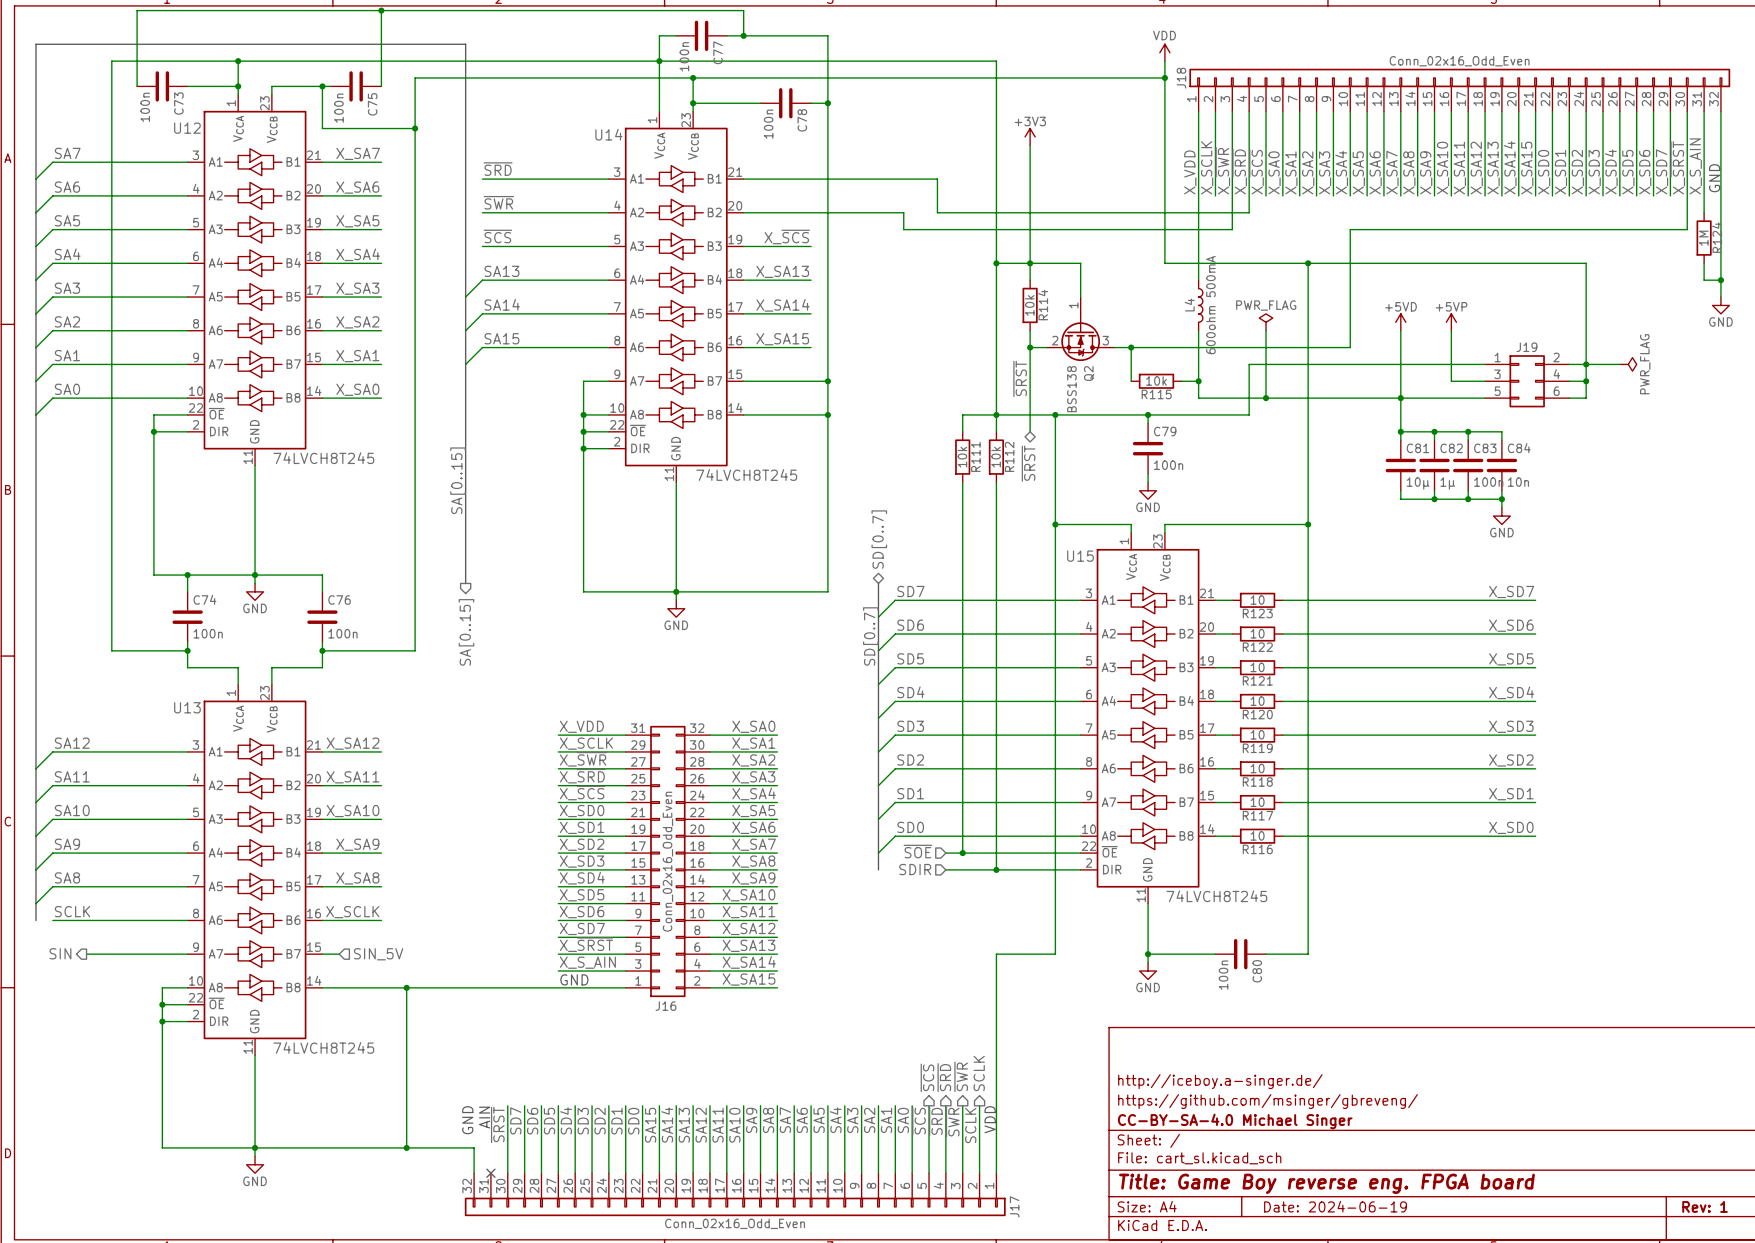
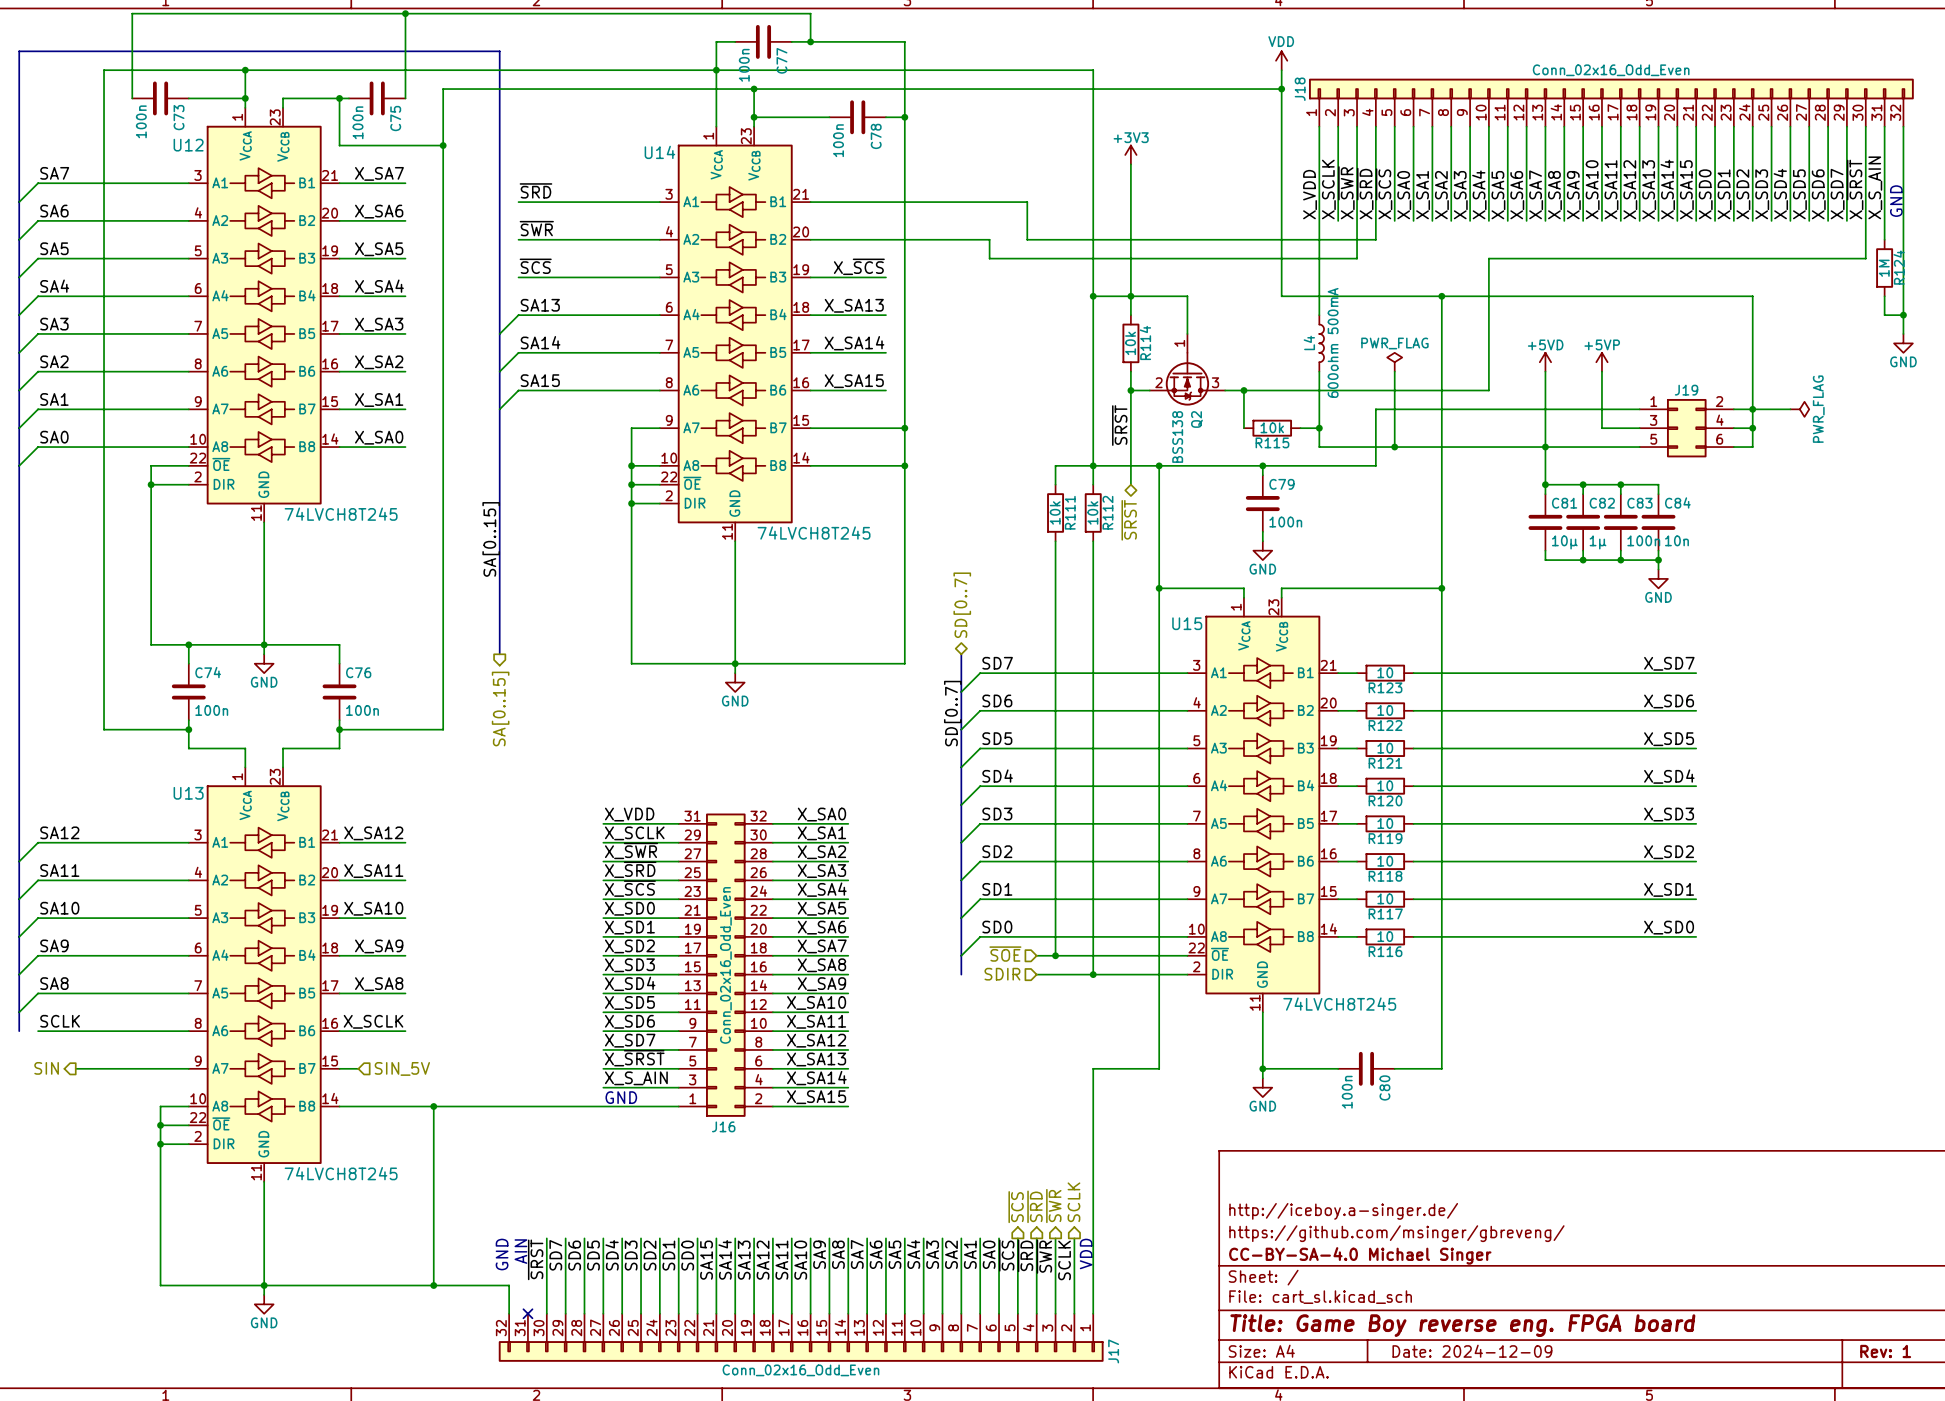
title block: Date: 2024-06-19 (1335, 1206) -> Date: 2024-12-09 (1472, 1351)

